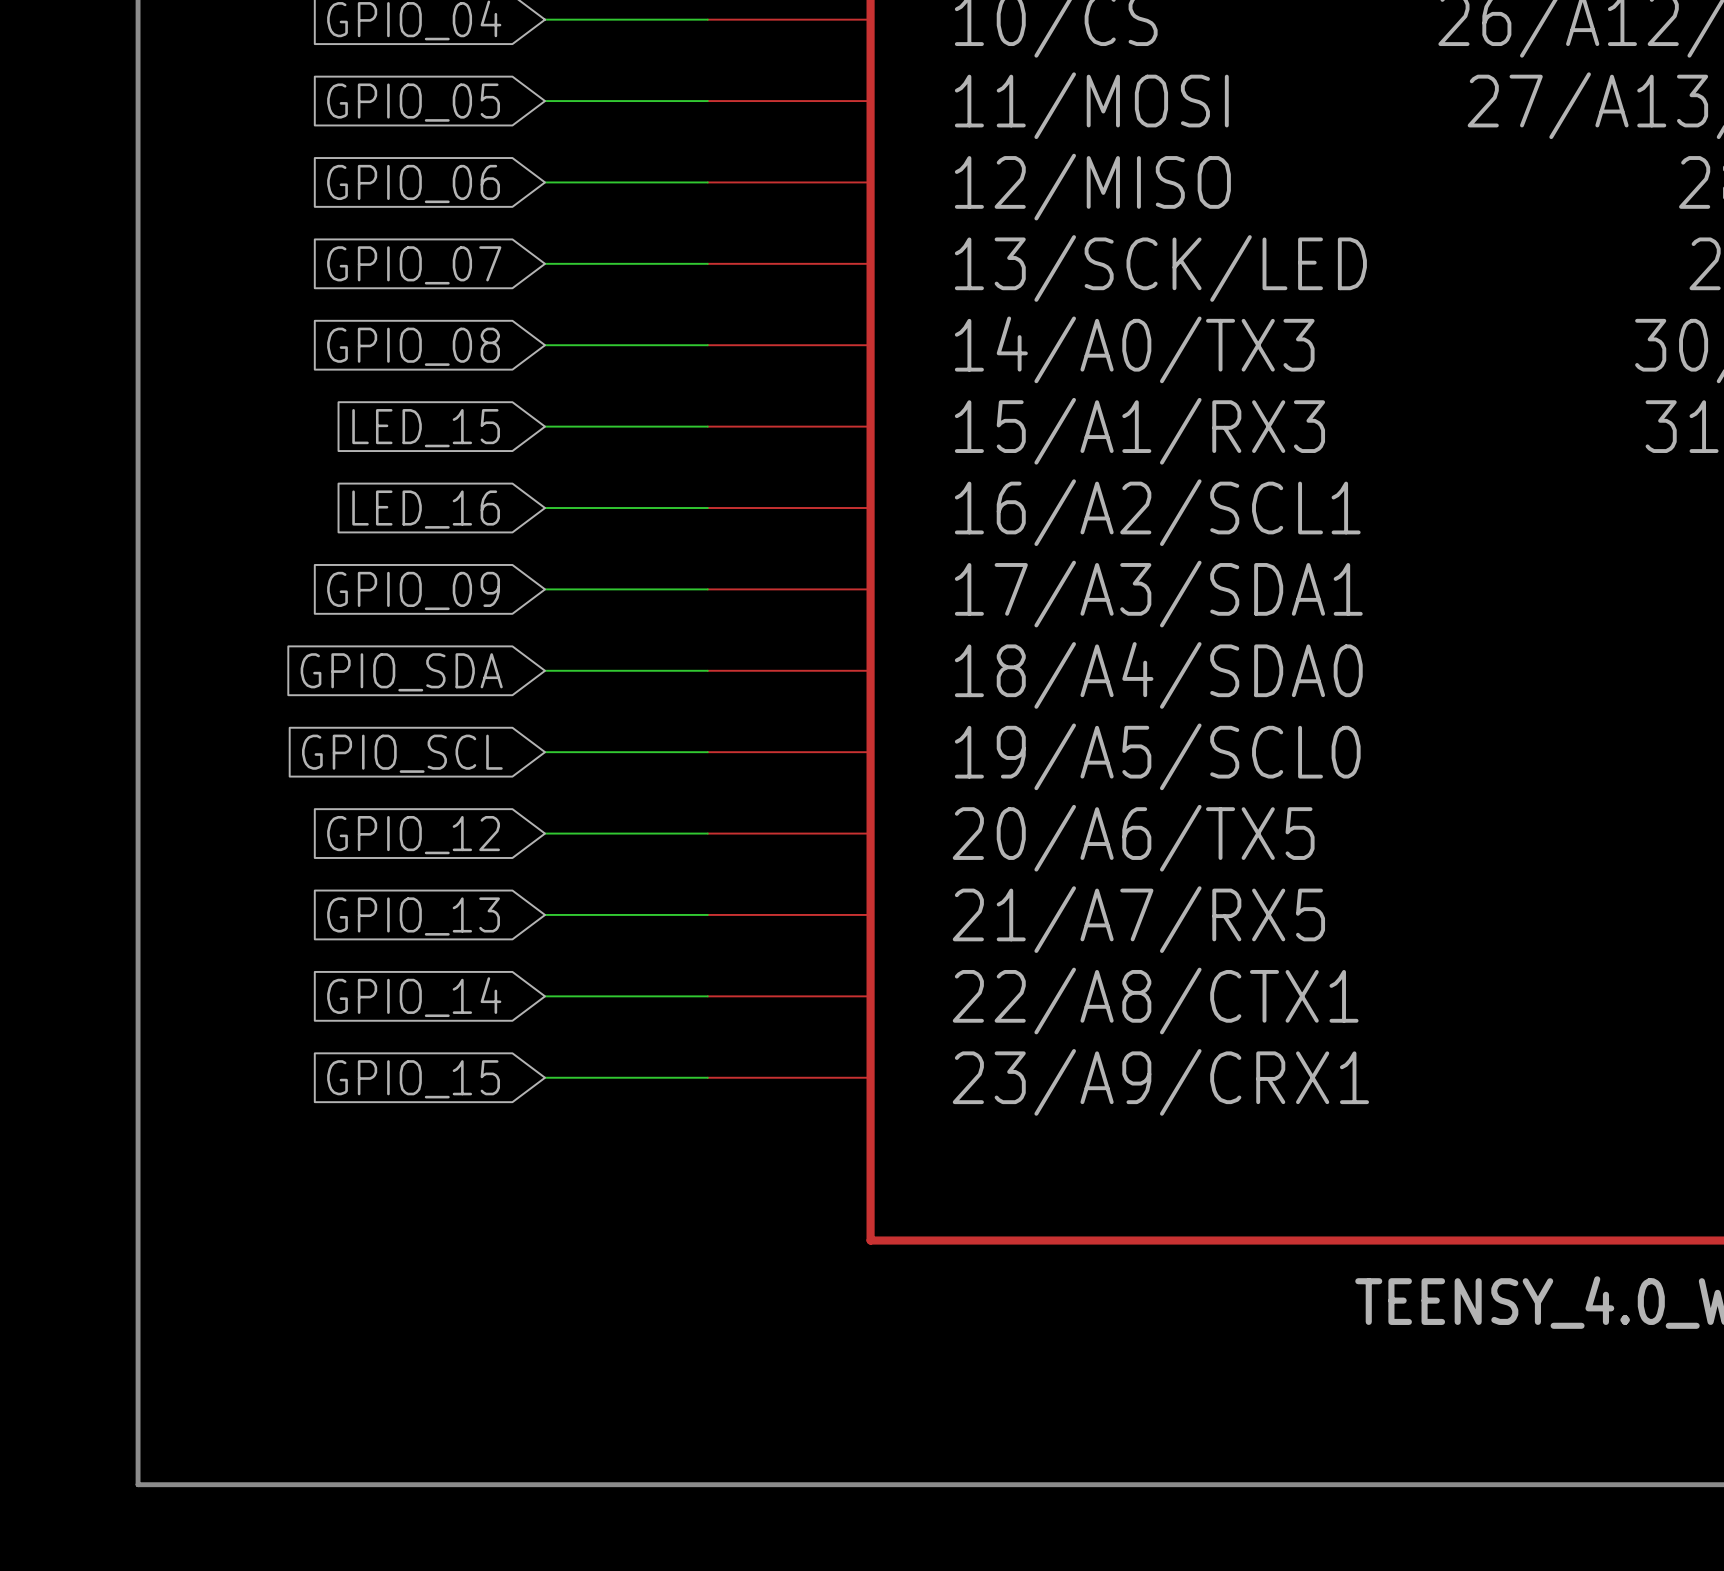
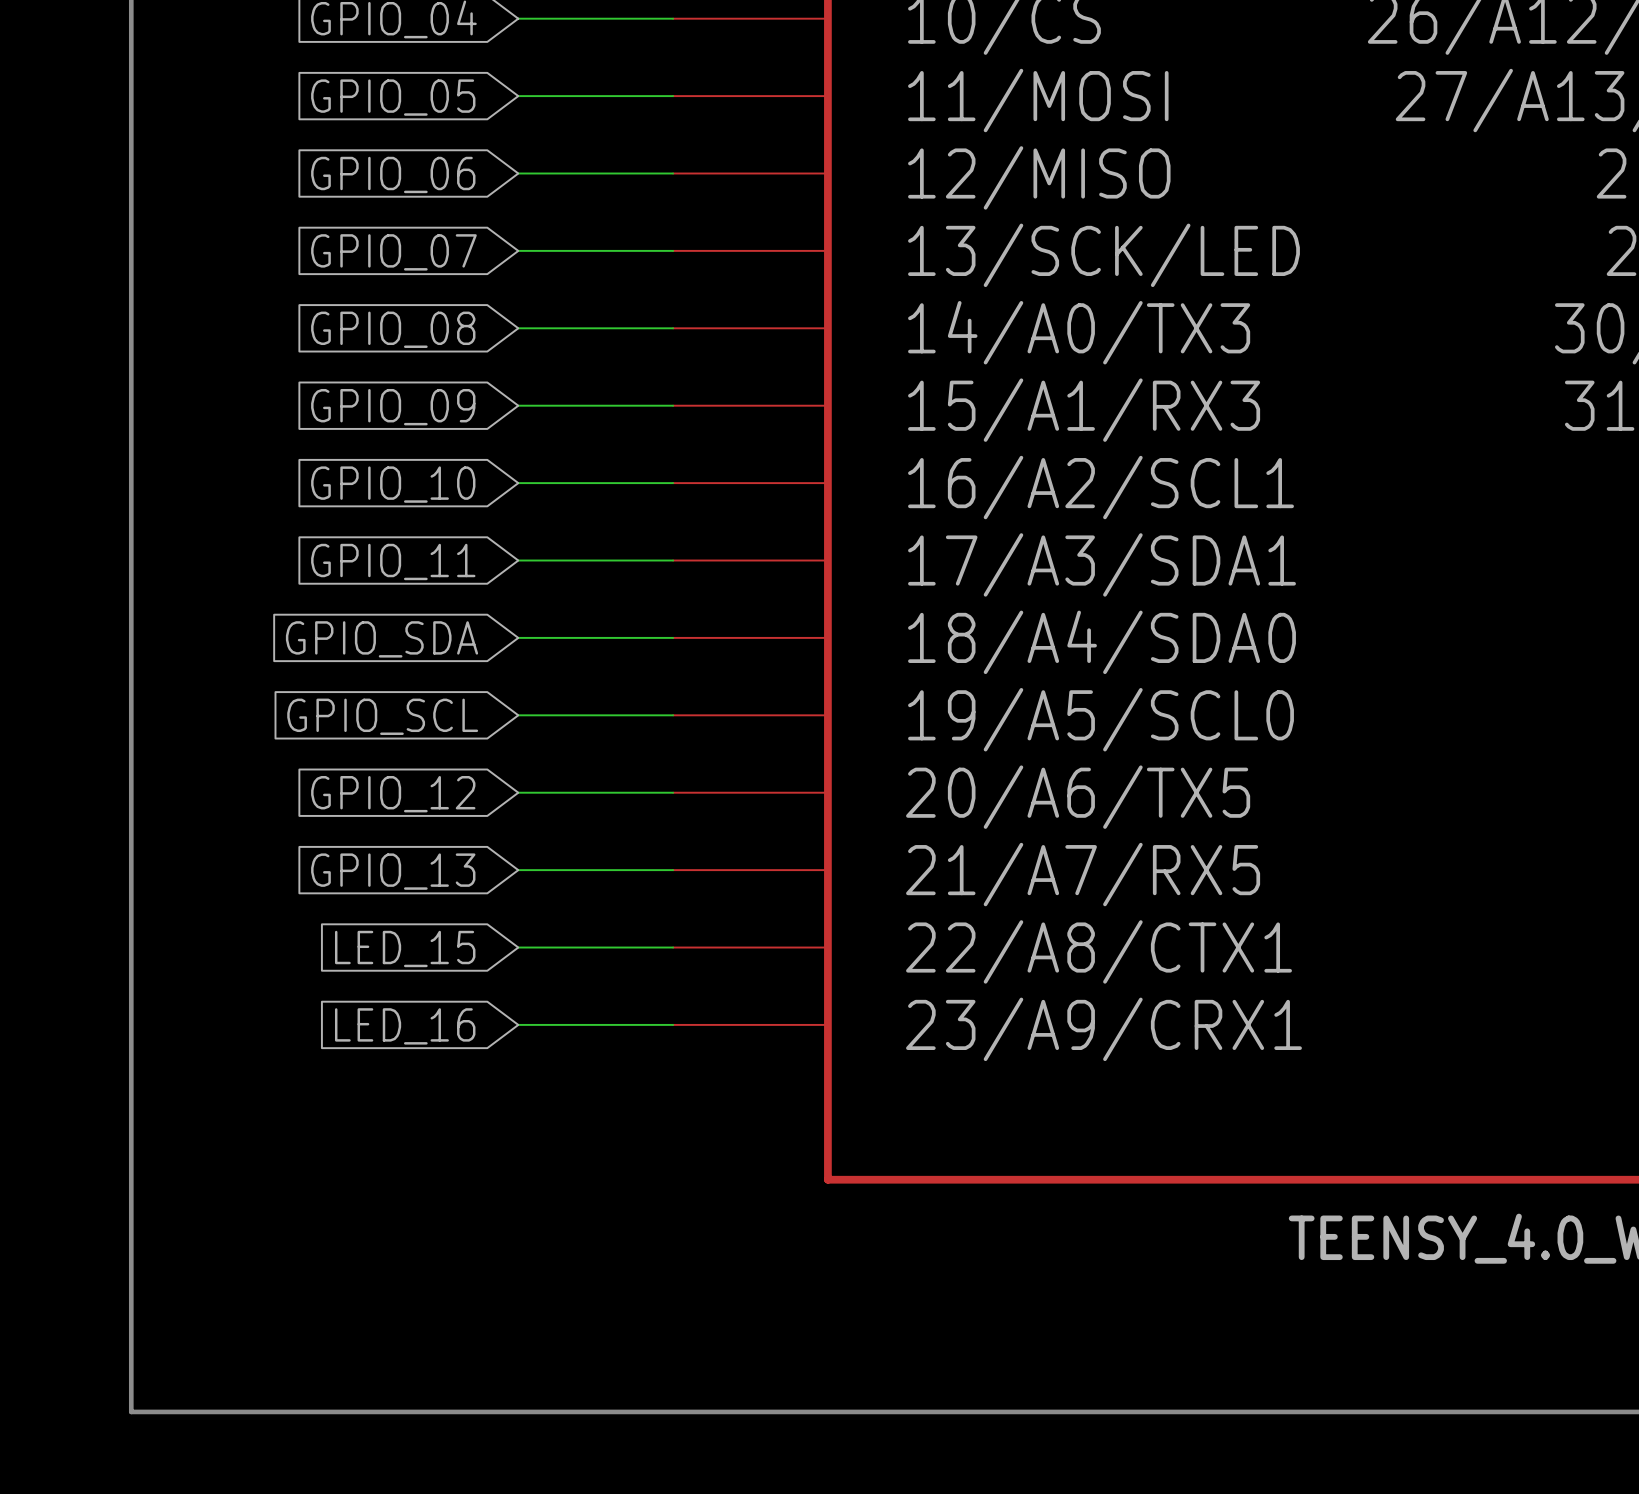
global label: LED_15 (426, 428) -> GPIO_09 (393, 407)
global label: LED_16 (426, 509) -> GPIO_10 (393, 484)
global label: GPIO_09 (413, 590) -> GPIO_11 (393, 561)
global label: GPIO_14 (414, 997) -> LED_15 (405, 948)
global label: GPIO_15 (413, 1079) -> LED_16 (405, 1026)

